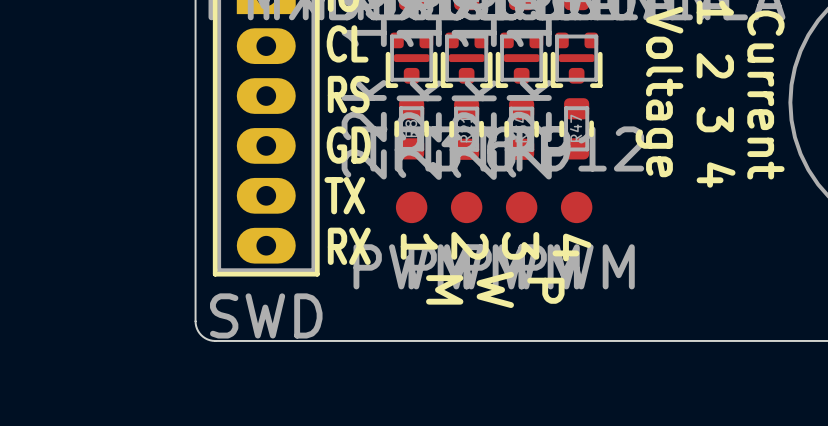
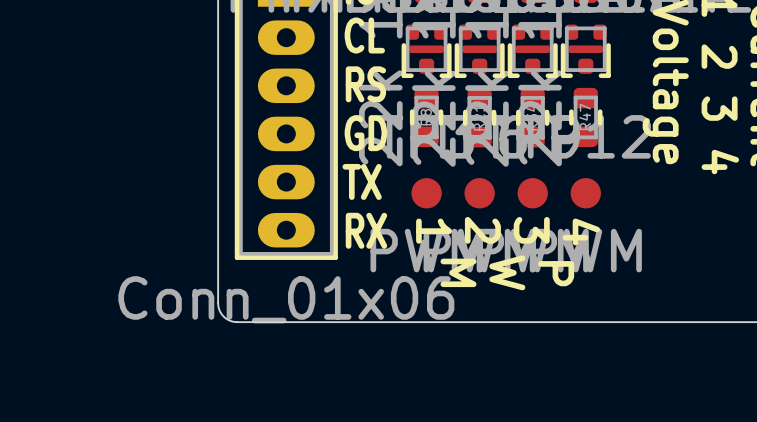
part value: SWD (266, 315) -> Conn_01x06 (286, 299)

